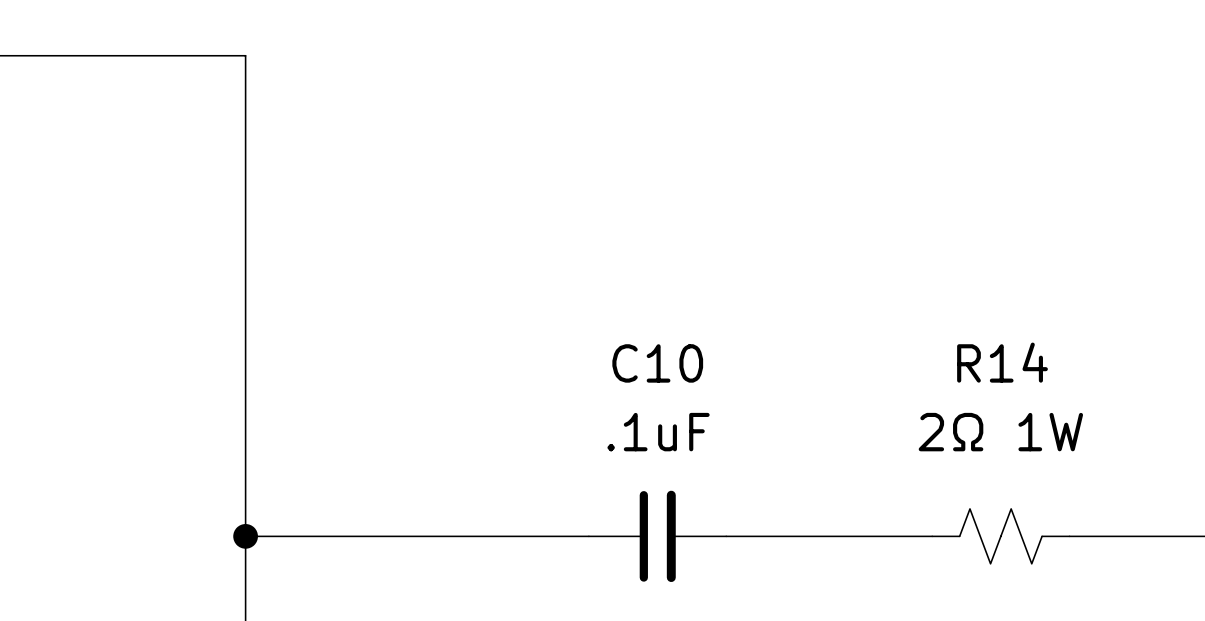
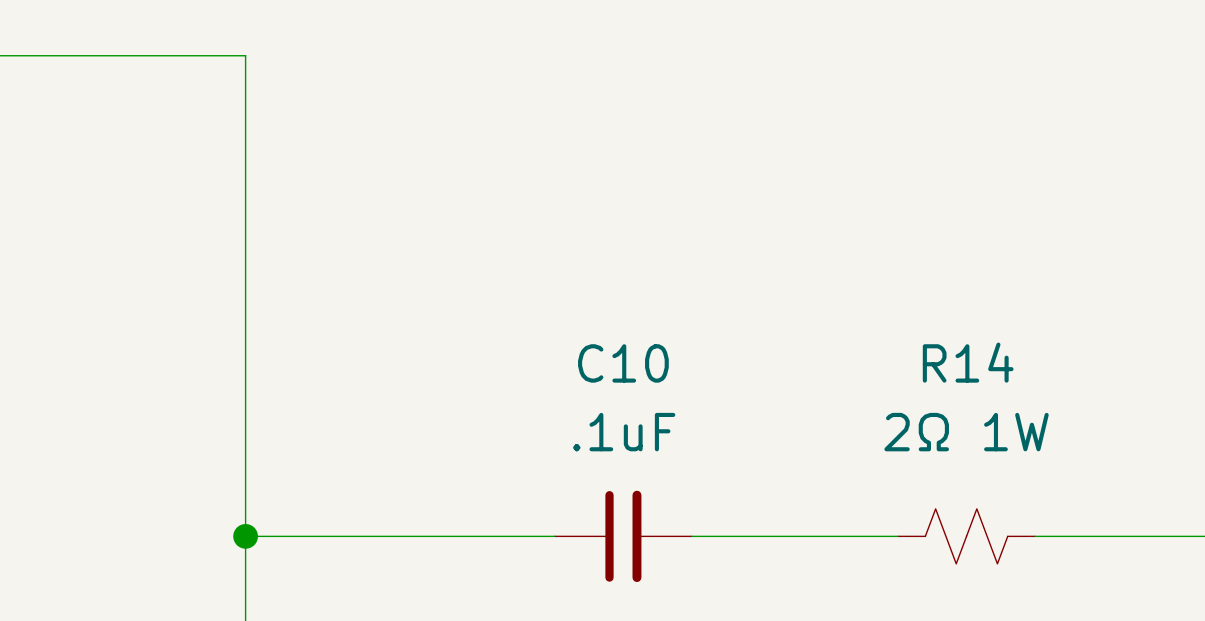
C10 position: (657, 536) -> (623, 536)
R14 position: (1000, 536) -> (966, 536)

